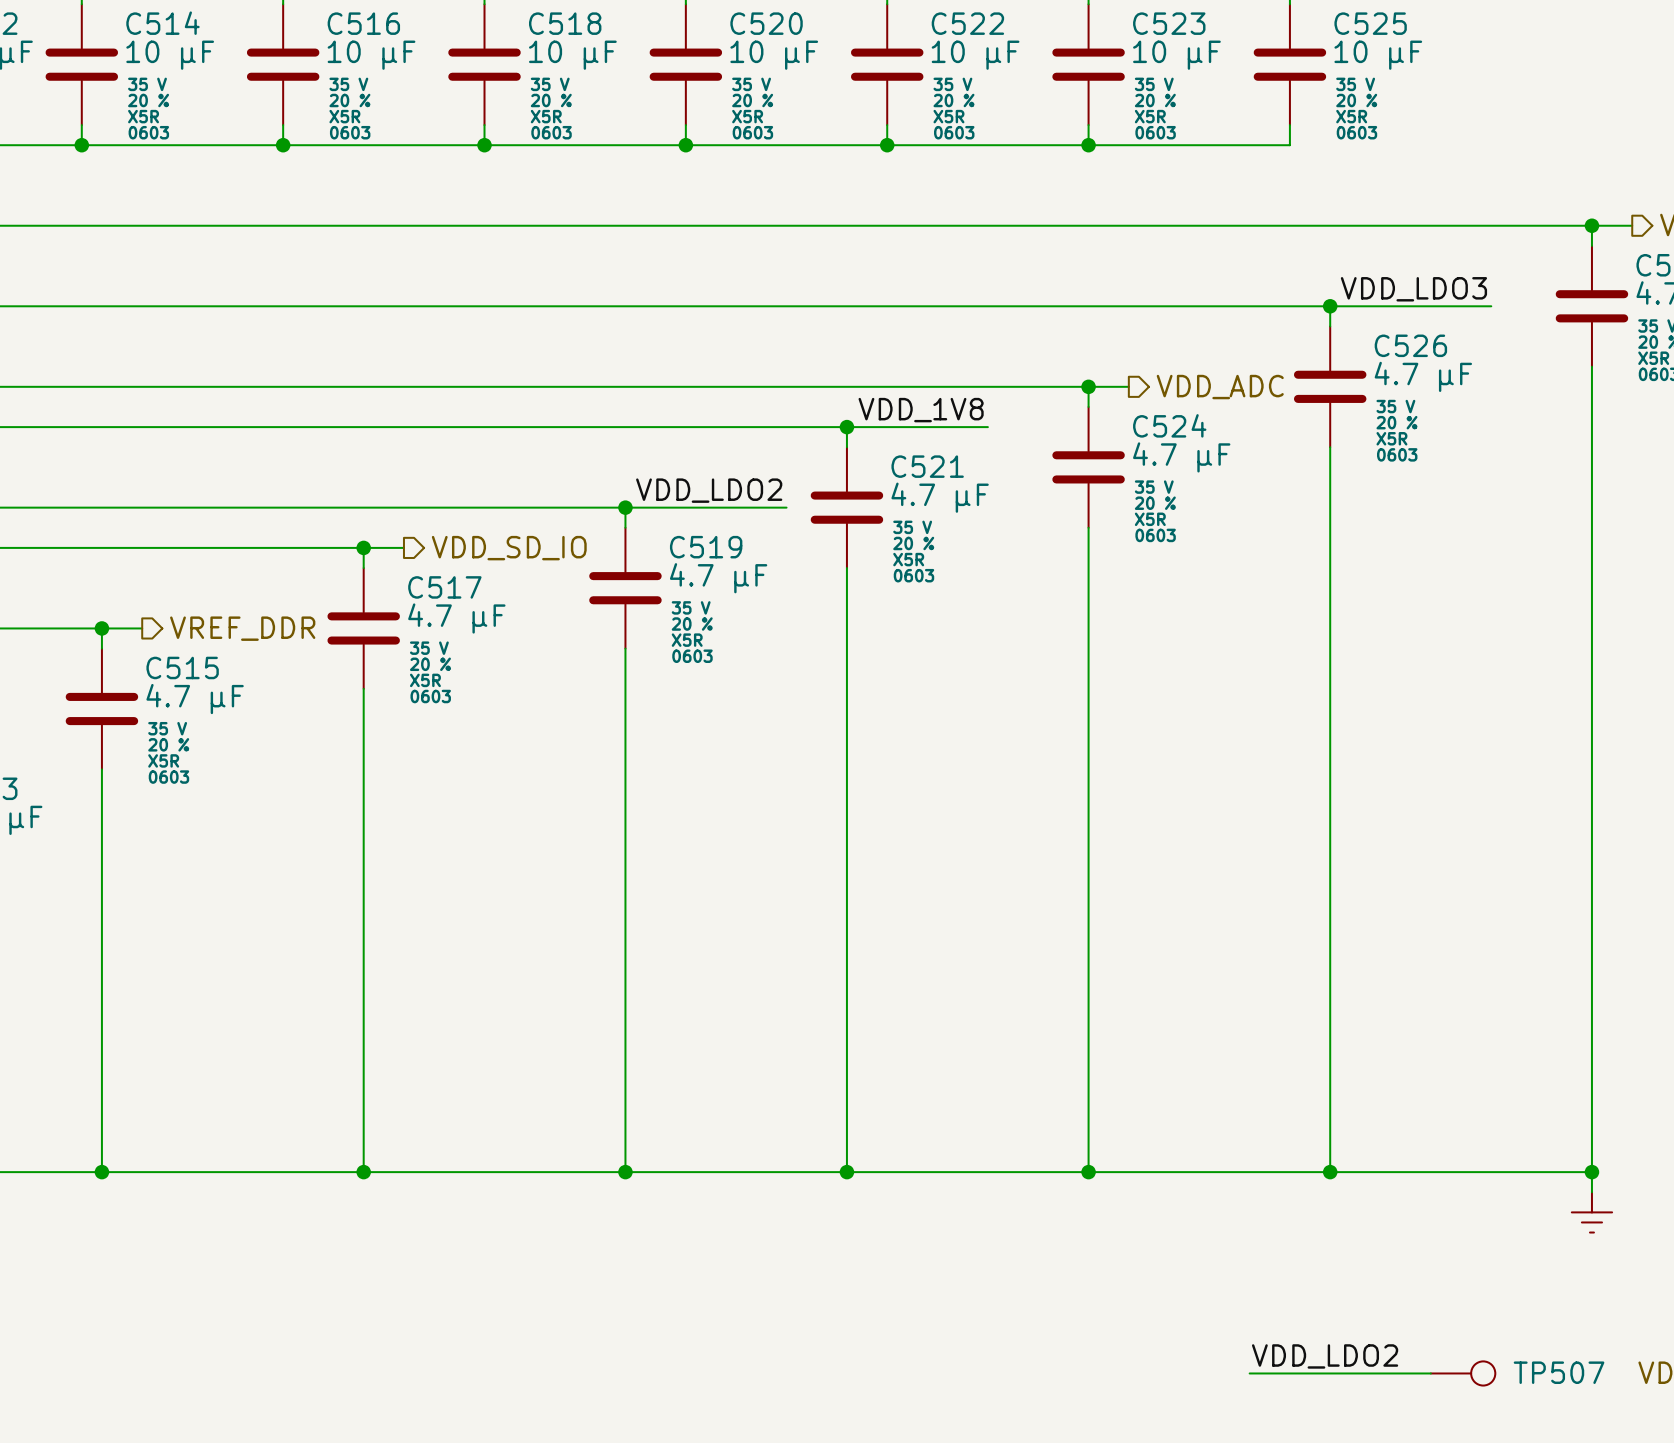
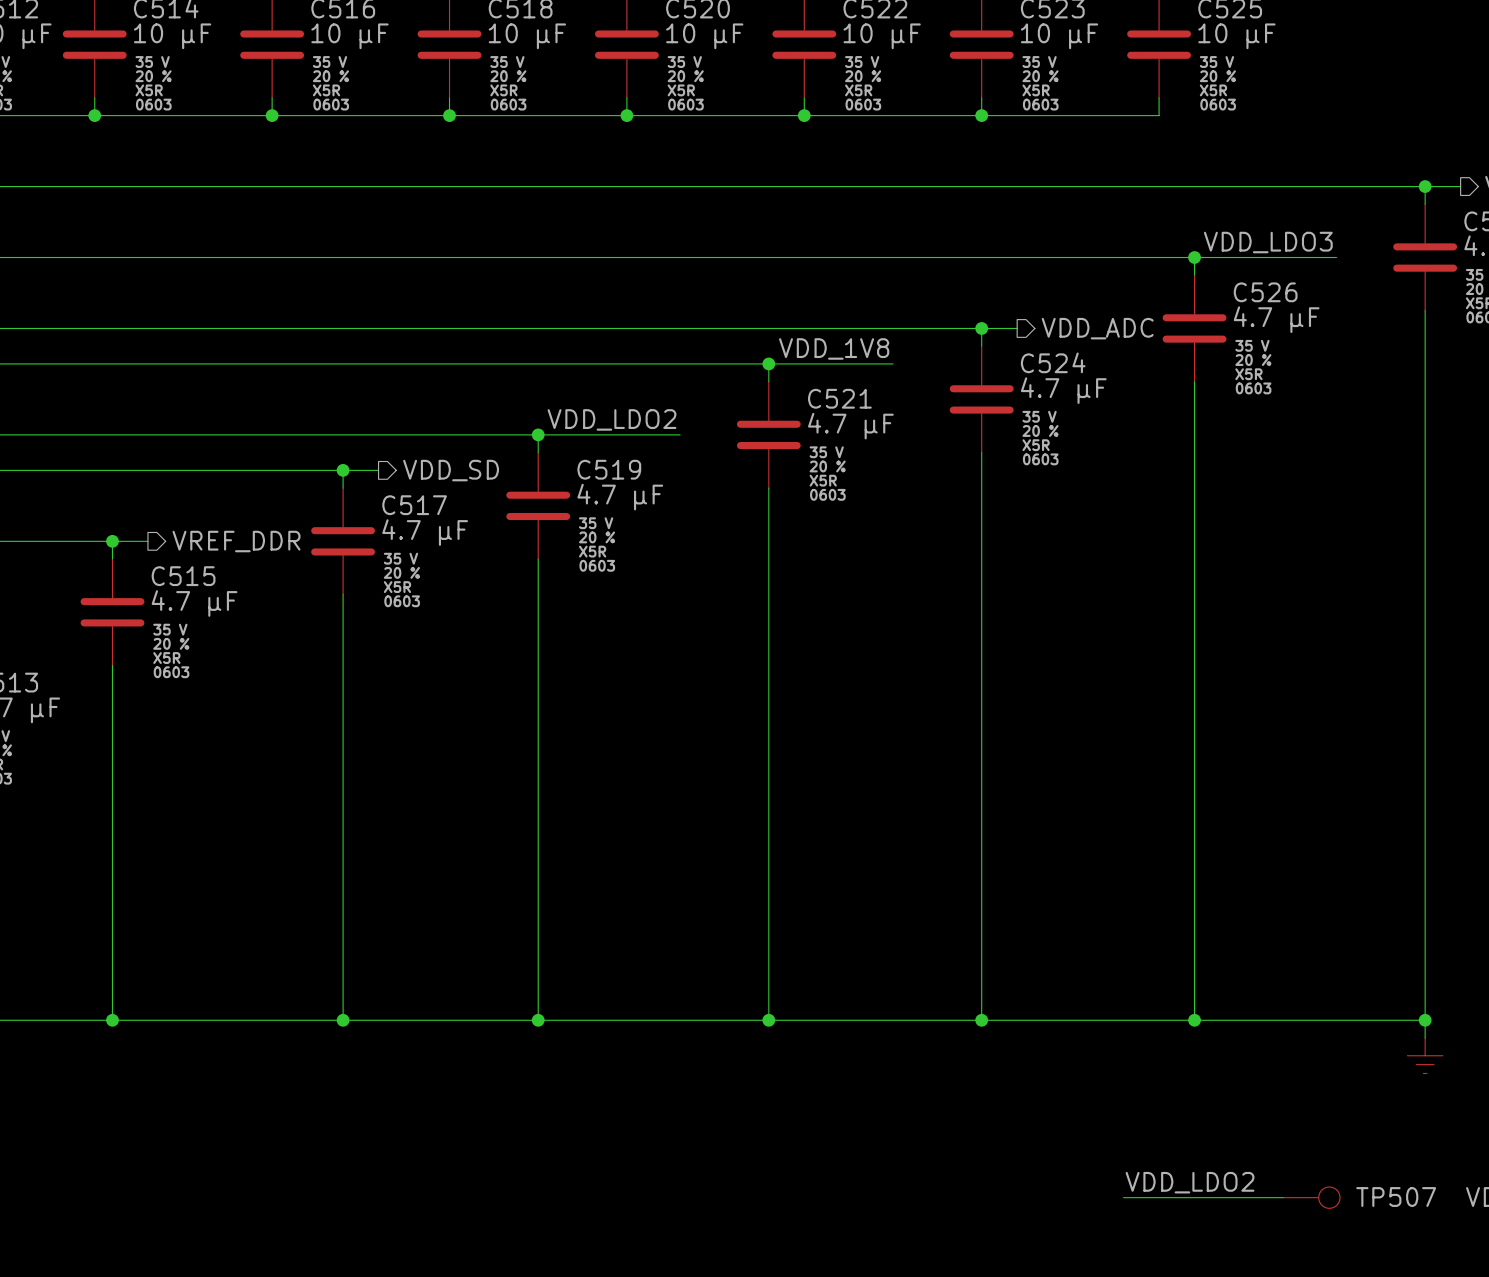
label position: VDD_LDO2 (709, 490) -> VDD_LDO2 (611, 419)
wire: (625, 507) (625, 527) -> (538, 434) (538, 452)
junction position: (625, 507) -> (538, 434)
wire: (746, 507) (786, 507) -> none
hierarchical label: VDD_SD_IO (509, 548) -> VDD_SD (451, 470)
C519 position: (625, 588) -> (538, 505)
wire: (625, 648) (625, 1172) -> (538, 559) (538, 1020)
junction position: (625, 1172) -> (538, 1020)

